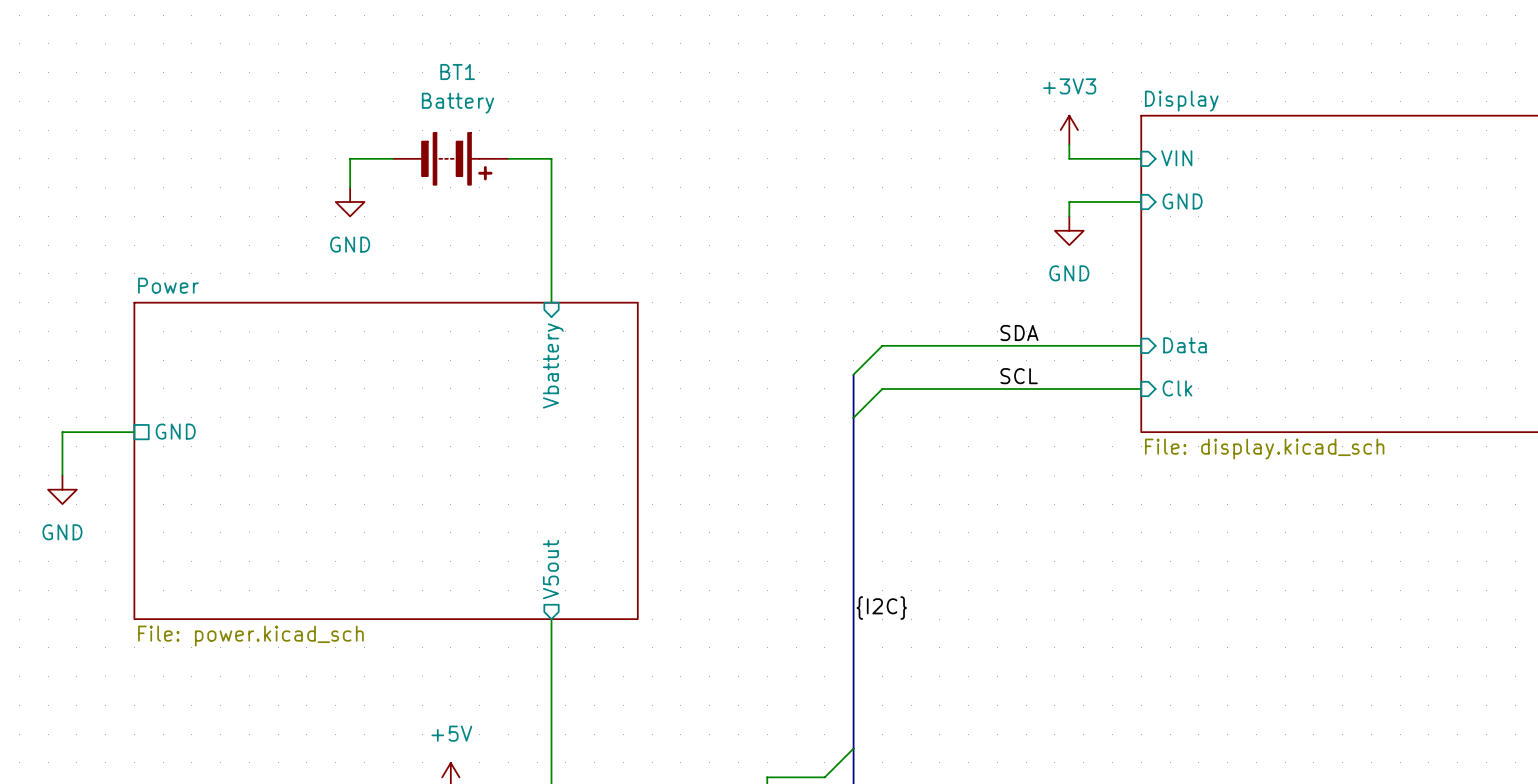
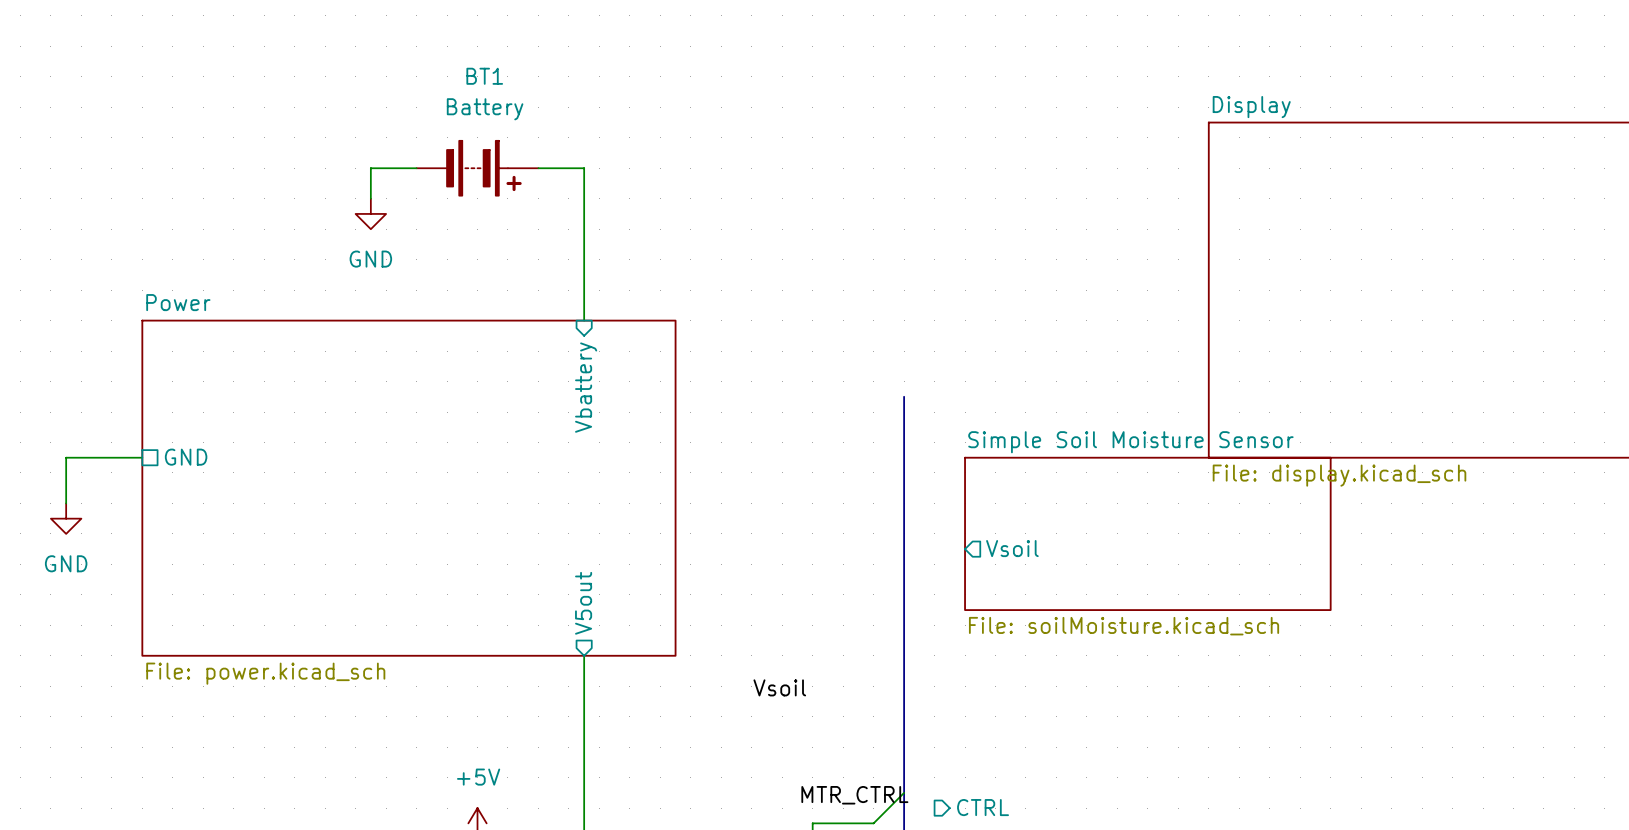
power symbol: +3V3 (1069, 130) -> none
wire: (1069, 144) (1069, 158) (1141, 158) -> none
sheet pin: VIN (1176, 158) -> none
sheet pin: GND (1182, 201) -> none
wire: (1141, 202) (1069, 202) (1069, 216) -> none
power symbol: GND (1069, 230) -> none
label: SDA (1019, 333) -> none
wire: (1141, 345) (882, 345) (853, 374) -> none
sheet pin: Data (1184, 345) -> none
label: SCL (1019, 376) -> none
wire: (1141, 388) (882, 388) (853, 417) -> none
sheet pin: Clk (1177, 388) -> none
sheet Simple Soil Moisture Sensor: none -> File: soilMoisture.kicad_sch (1147, 533)
sheet pin: none -> Vsoil (1012, 548)
label: {I2C} (881, 608) -> none
label: none -> Vsoil (779, 687)
label: none -> MTR_CTRL (854, 795)
sheet pin: none -> CTRL (983, 807)

